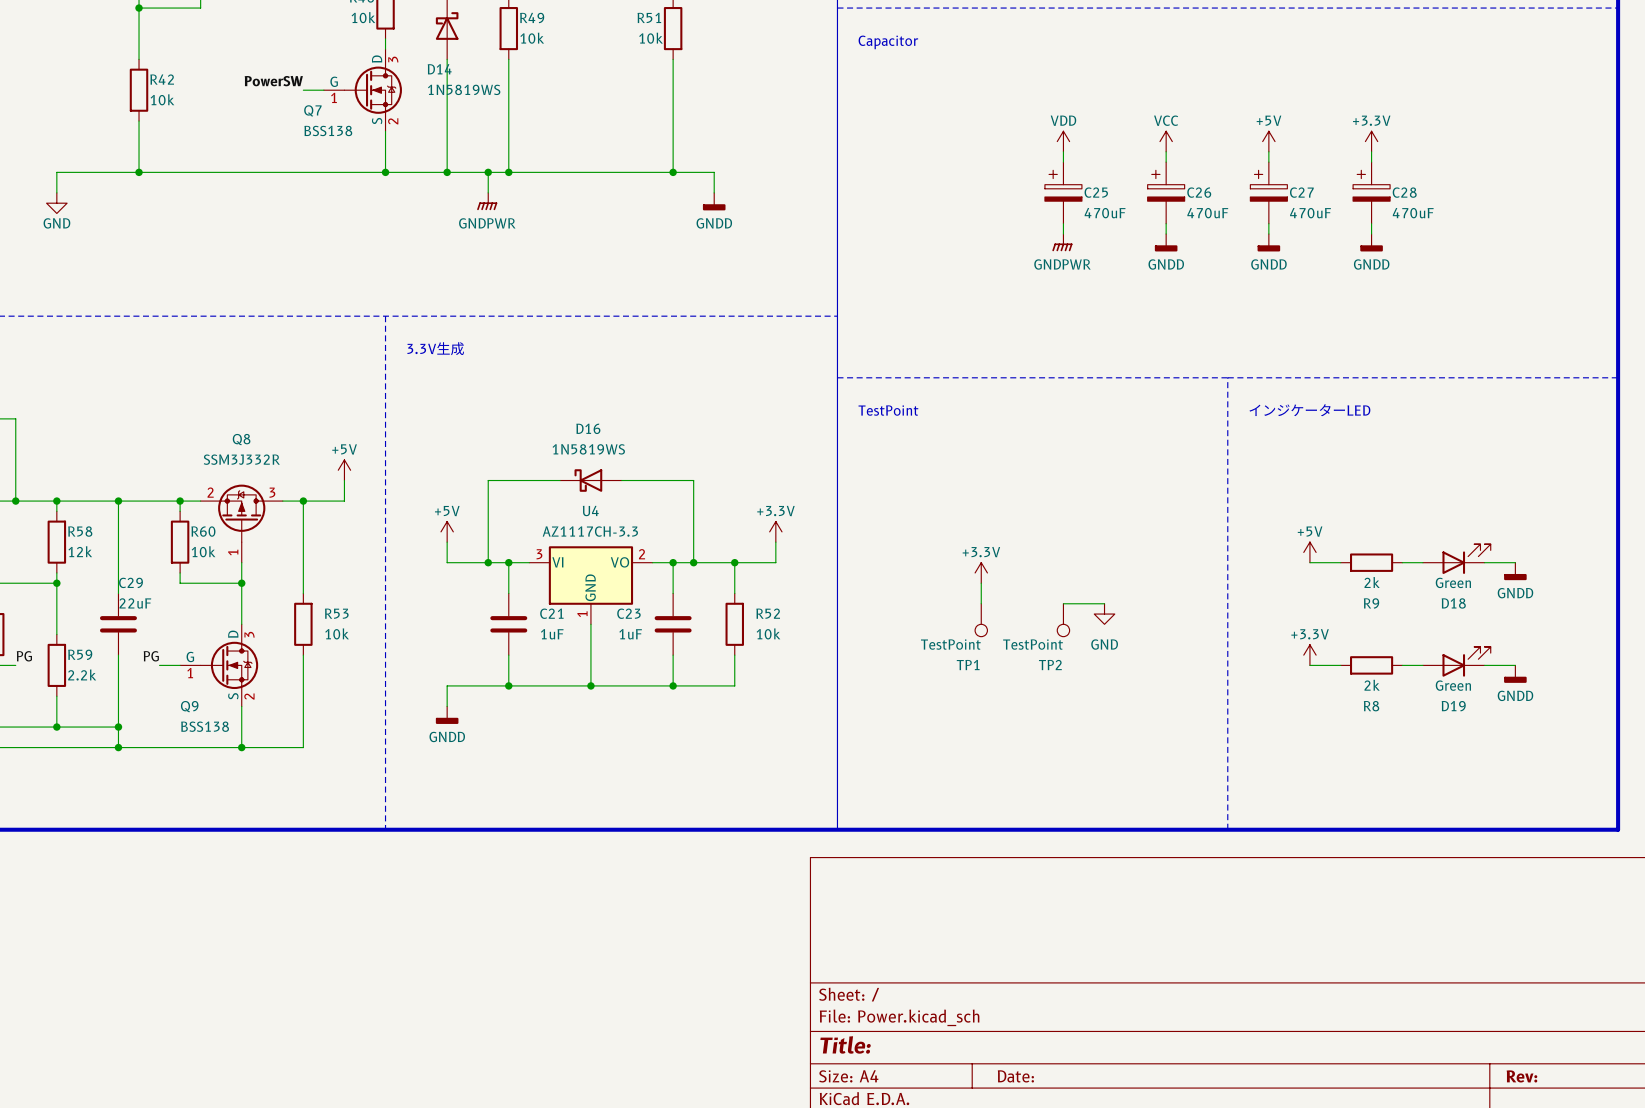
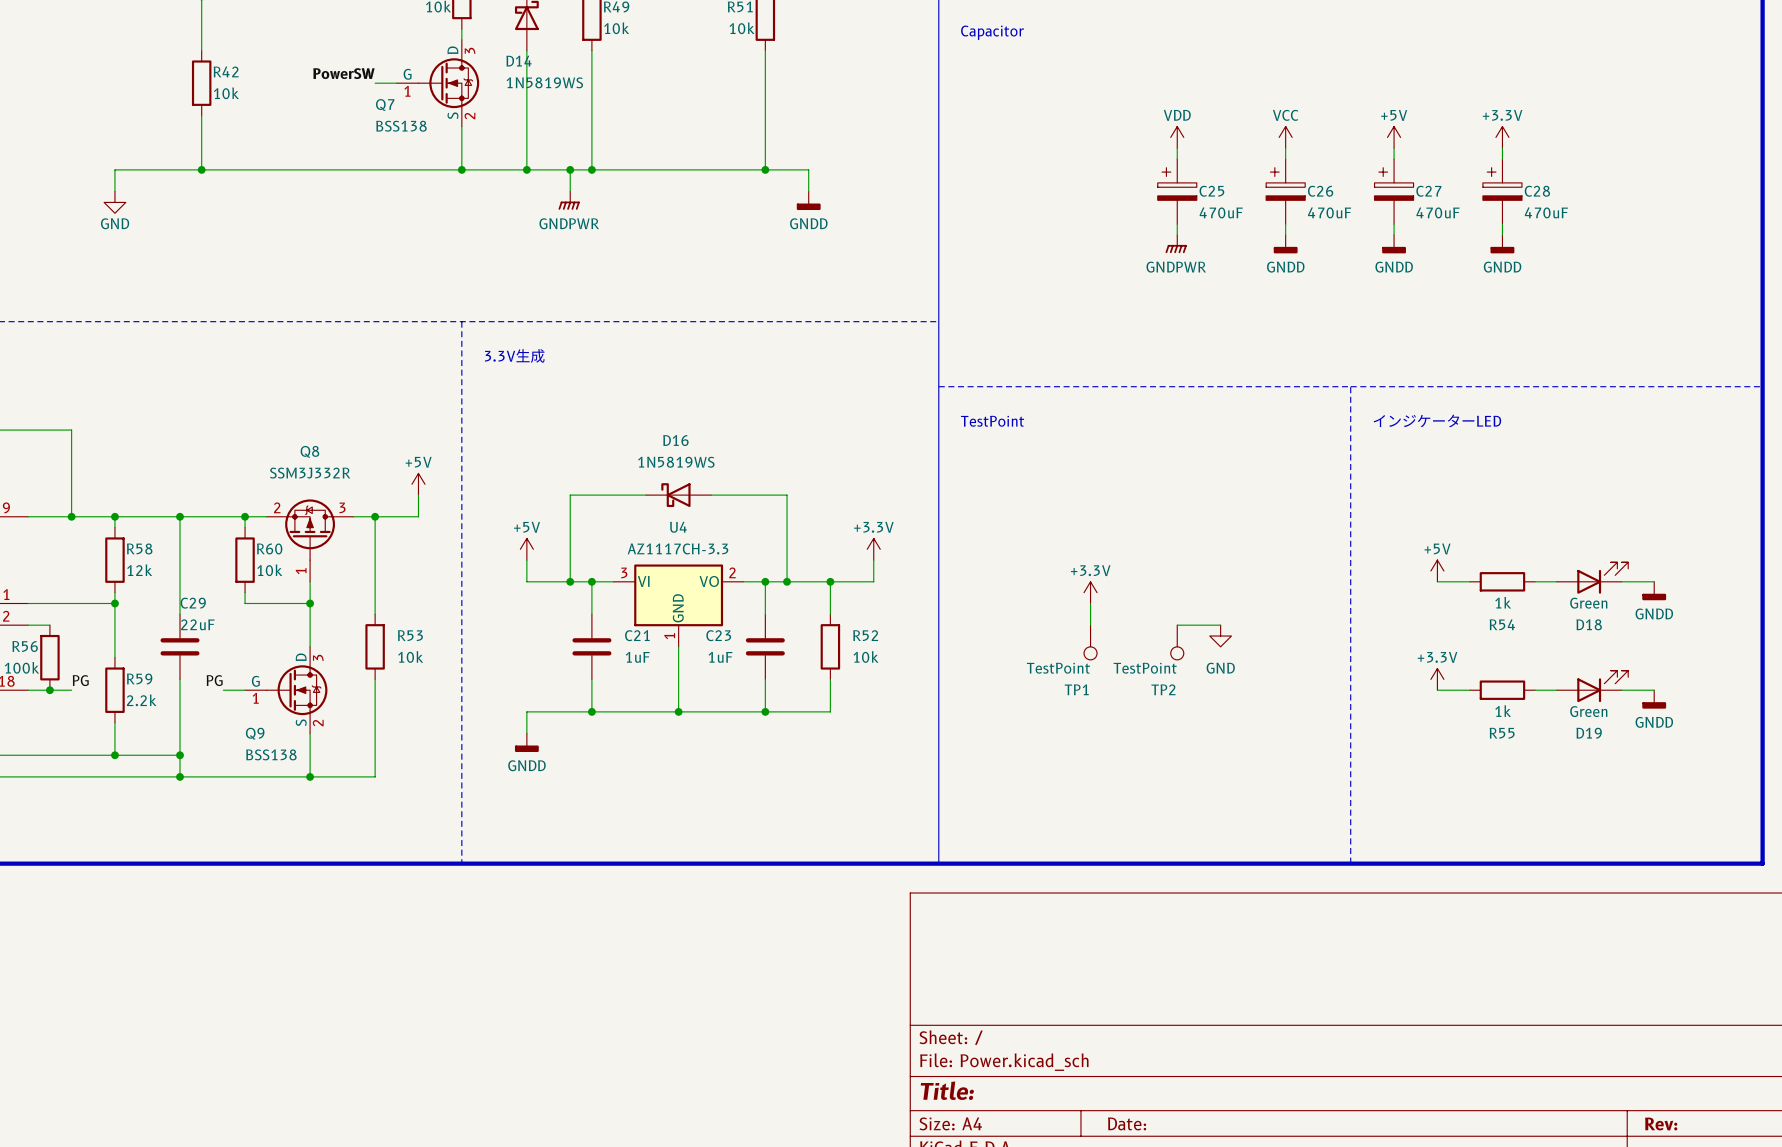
R9 value: 2k (1372, 582) -> 1k (1503, 602)
R9 name: R9 (1371, 603) -> R54 (1502, 624)
R8 value: 2k (1372, 685) -> 1k (1503, 711)
R8 name: R8 (1371, 706) -> R55 (1502, 733)

